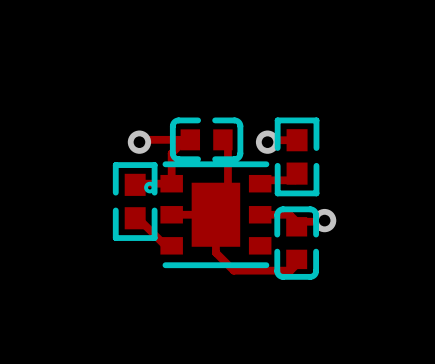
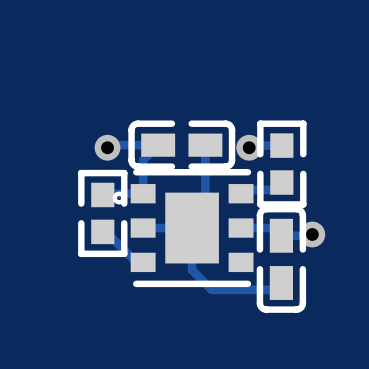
part footprint: [169, 117, 244, 163] -> [128, 120, 236, 170]
part footprint: [274, 206, 320, 280] -> [256, 205, 307, 313]

